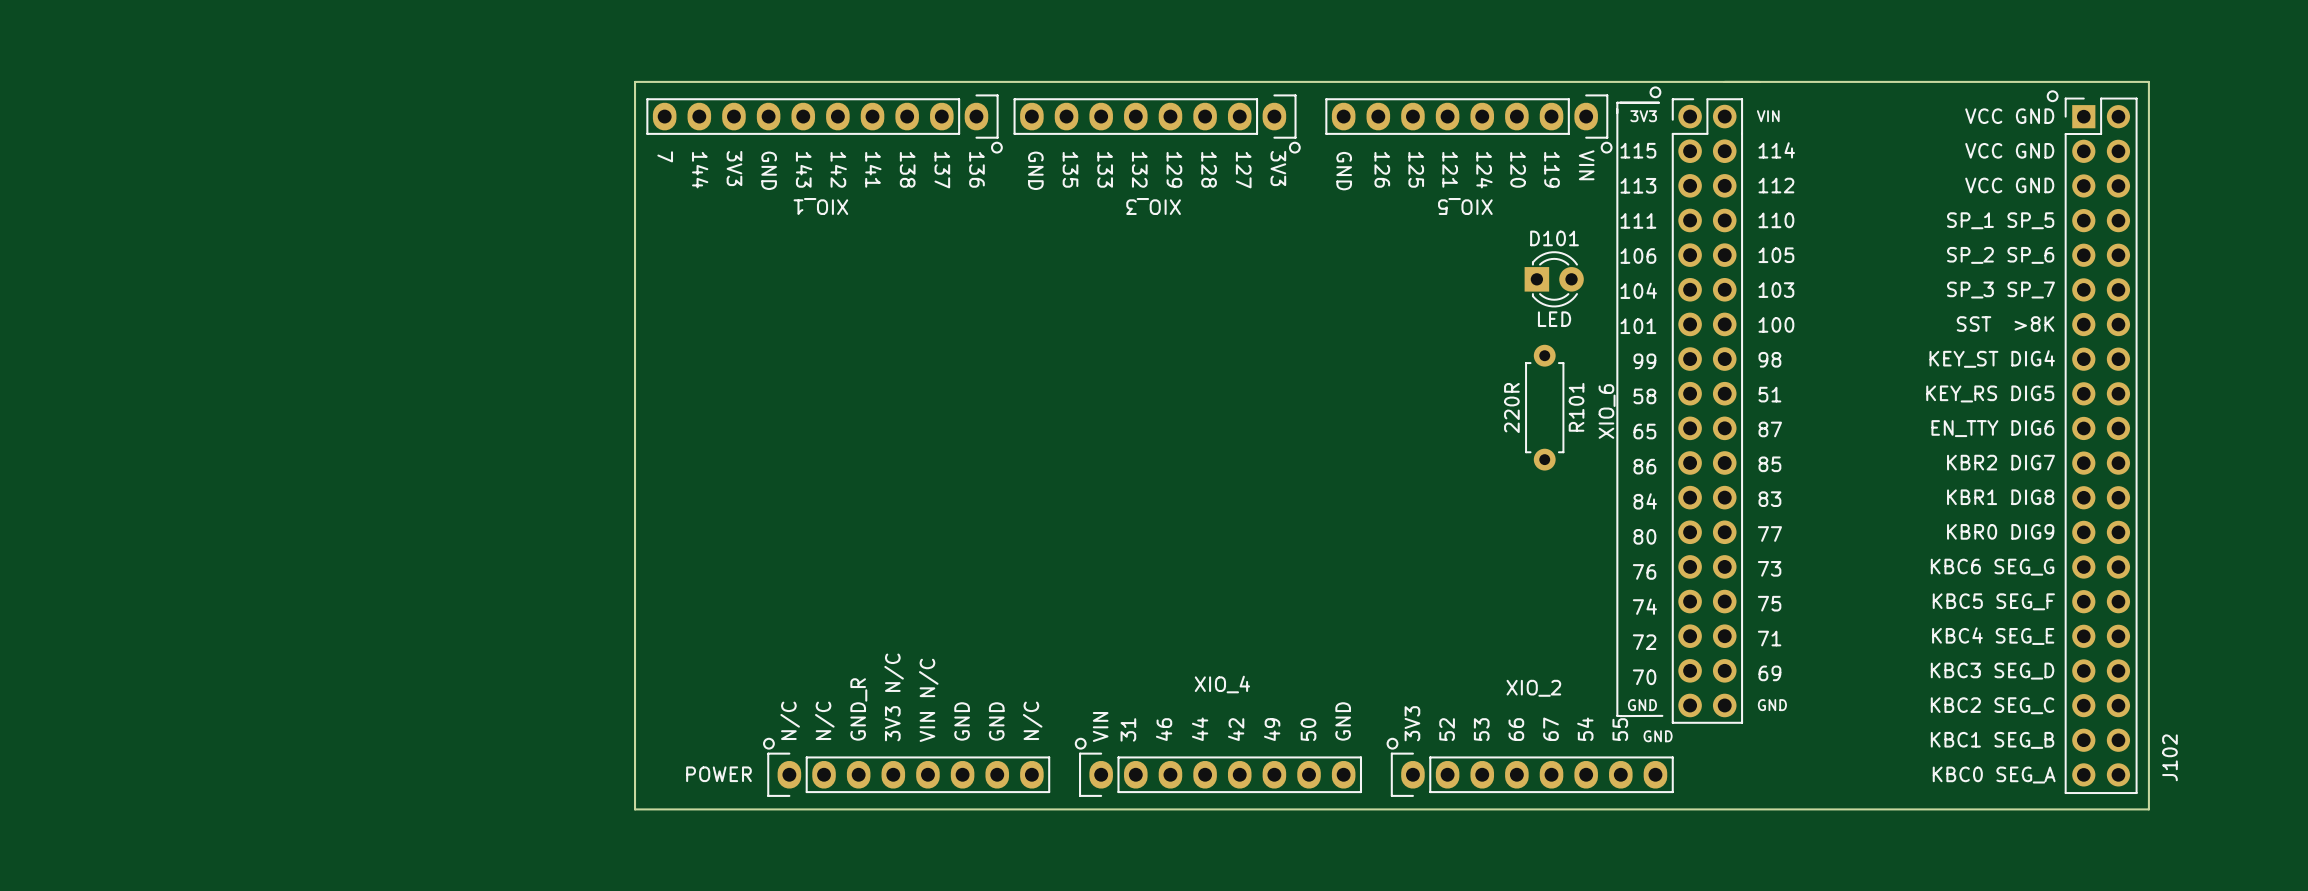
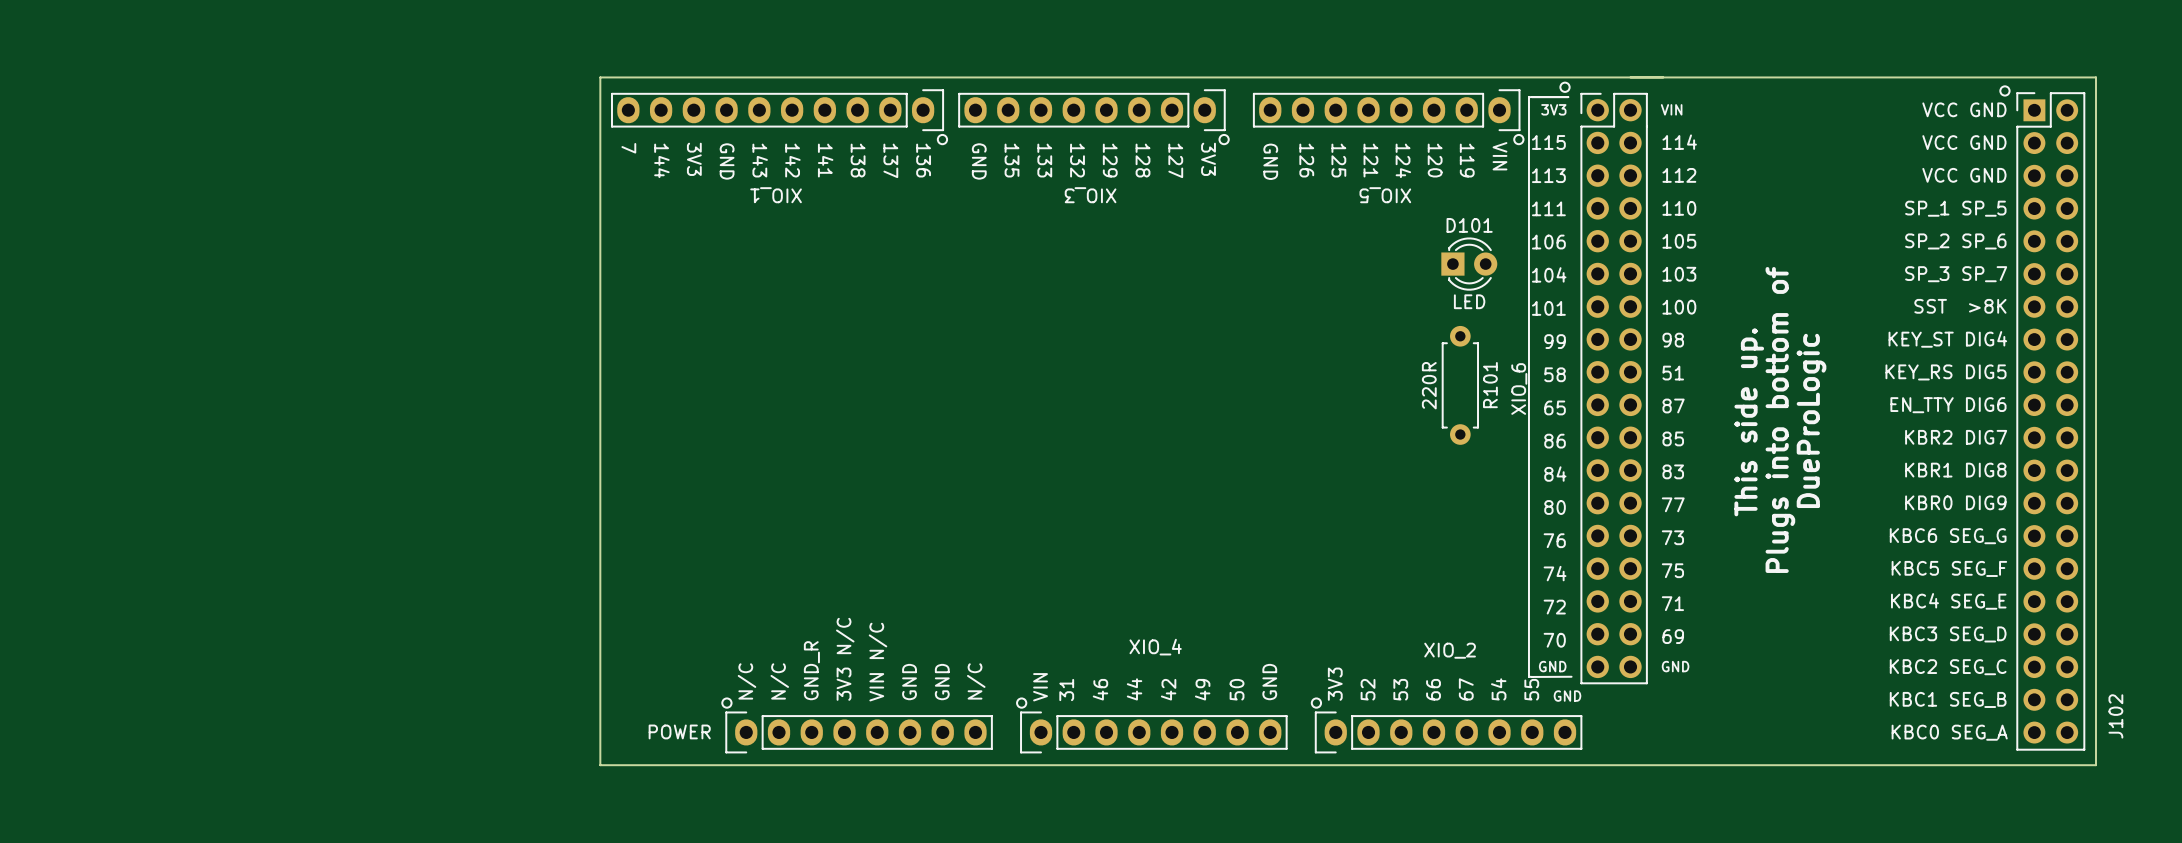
board edge: (2148, 81) (2148, 809) -> (2031, 77) (2095, 77) (2095, 765) (2031, 765)
drawing position: (2052, 96) -> (2004, 90)
text: none -> Plugs into bottom of (1780, 419)
text: none -> DueProLogic (1811, 420)
J102 position: (2101, 445) -> (2050, 421)
text: none -> This side up. (1749, 422)

